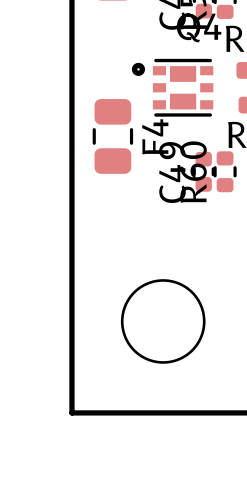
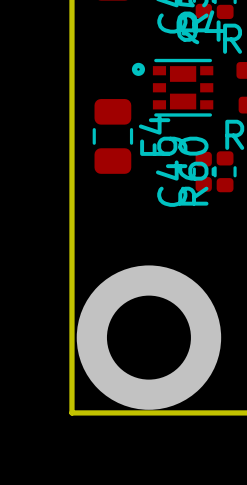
round board edge: [120, 279, 206, 364] -> none
via: none -> (148, 337)

